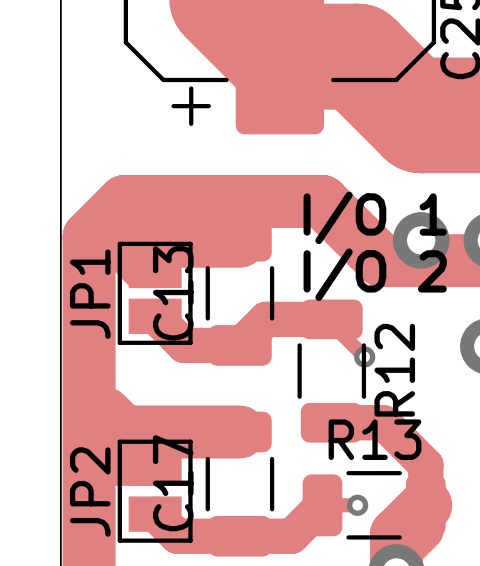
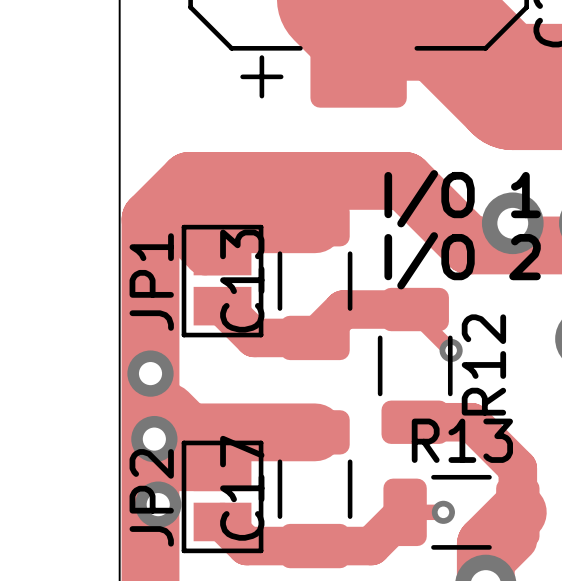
via: none -> (150, 373)
via: none -> (154, 439)
via: none -> (158, 504)

